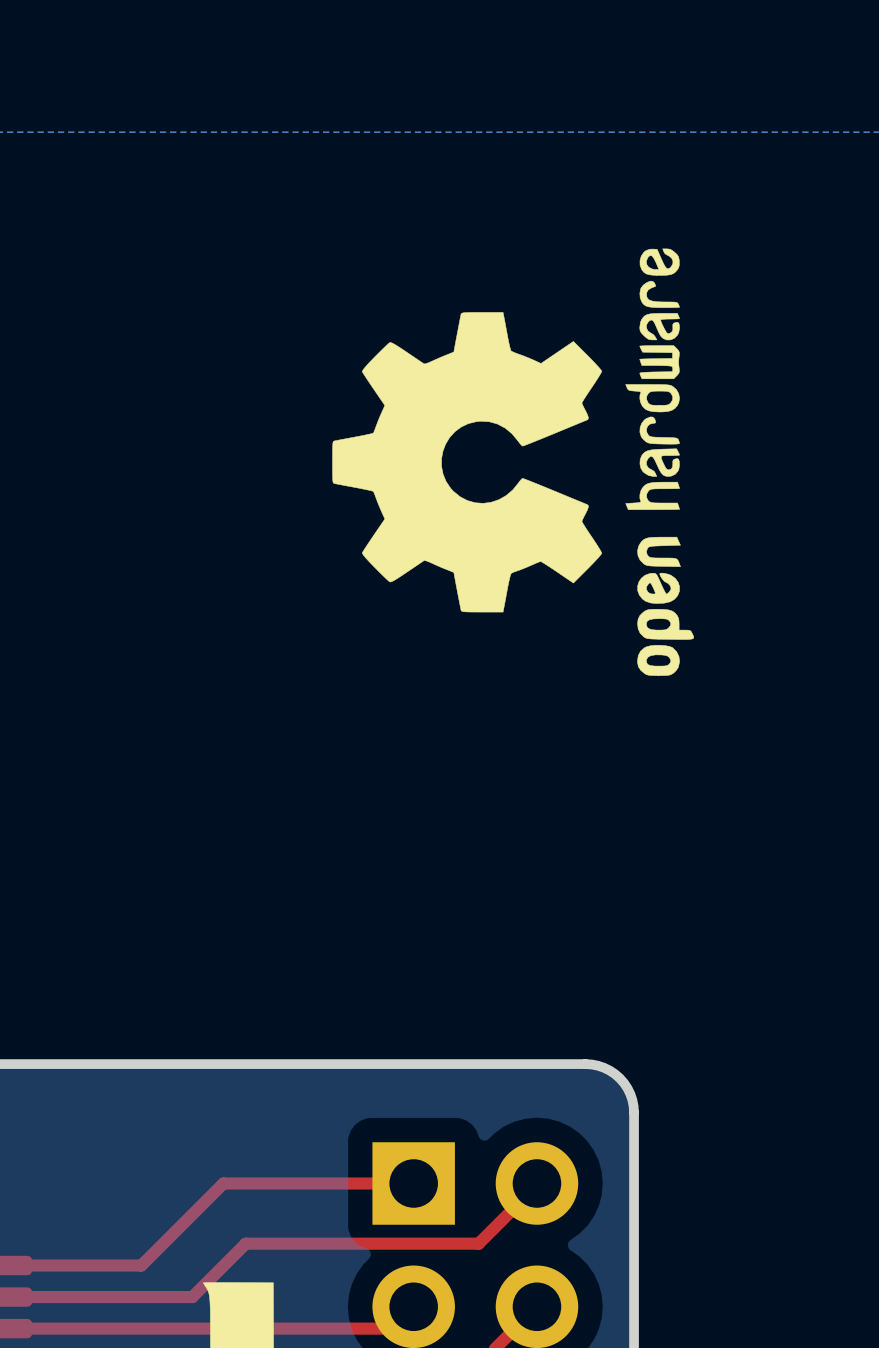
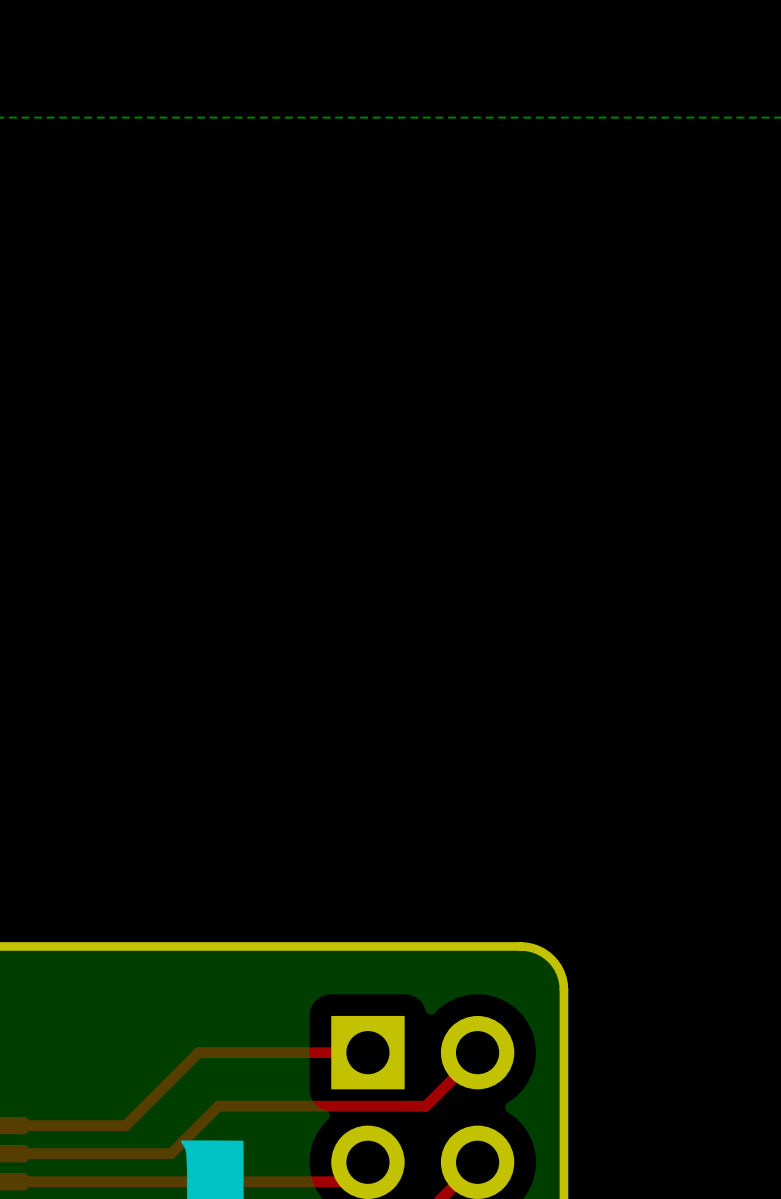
drawing: [332, 248, 695, 676] -> none

